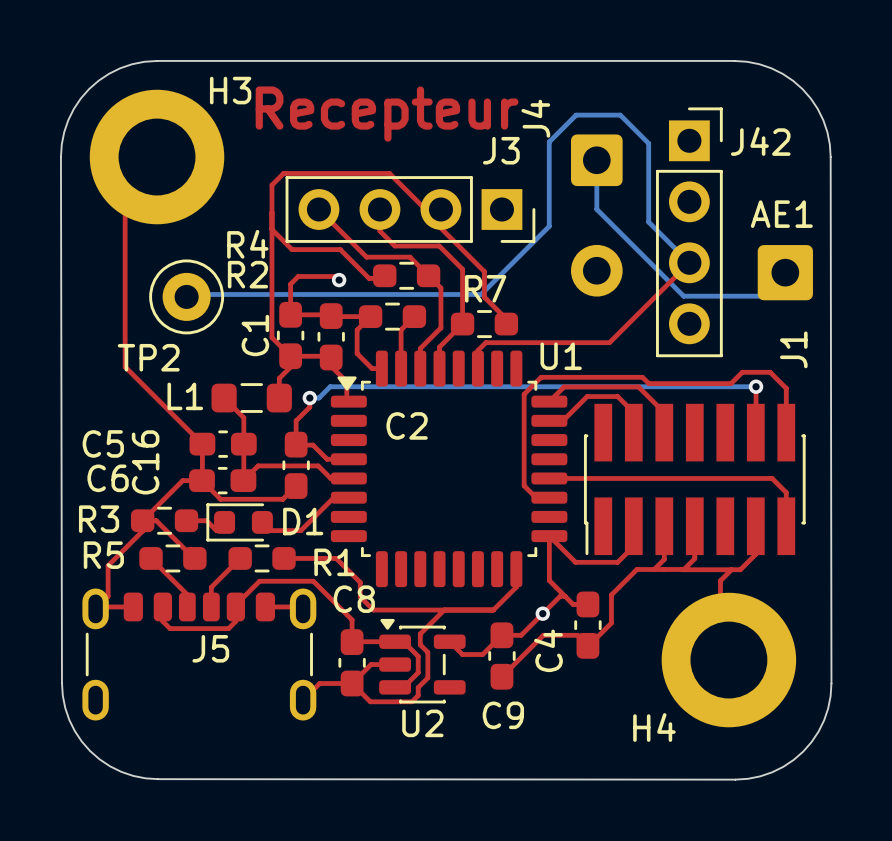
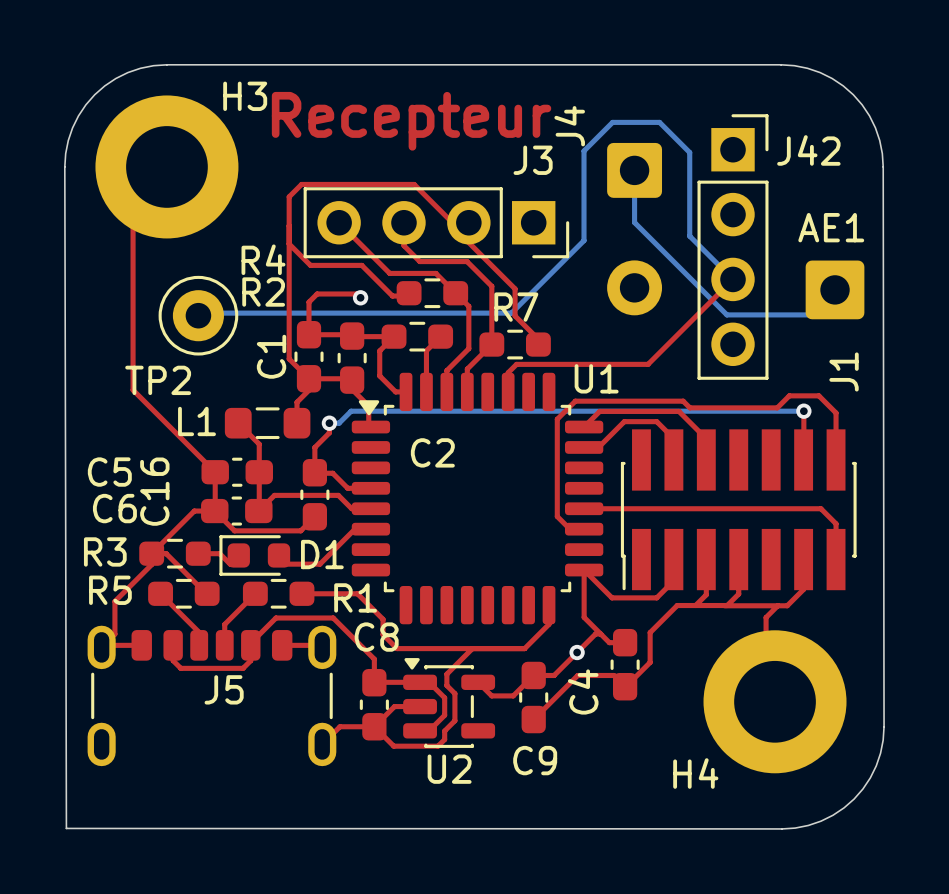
board edge: (60, 157) (61, 683) (65, 707) (69, 719) (74, 731) (90, 751) (99, 759) (121, 771) (133, 775) (158, 779) (735, 779) -> (64, 166) (66, 828) (781, 828)

